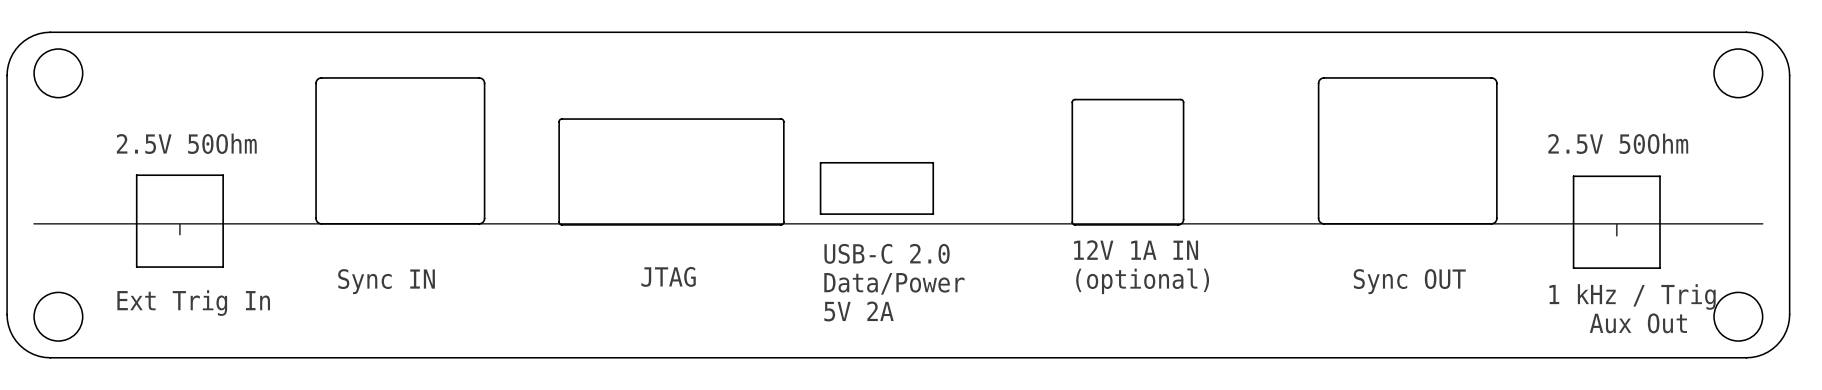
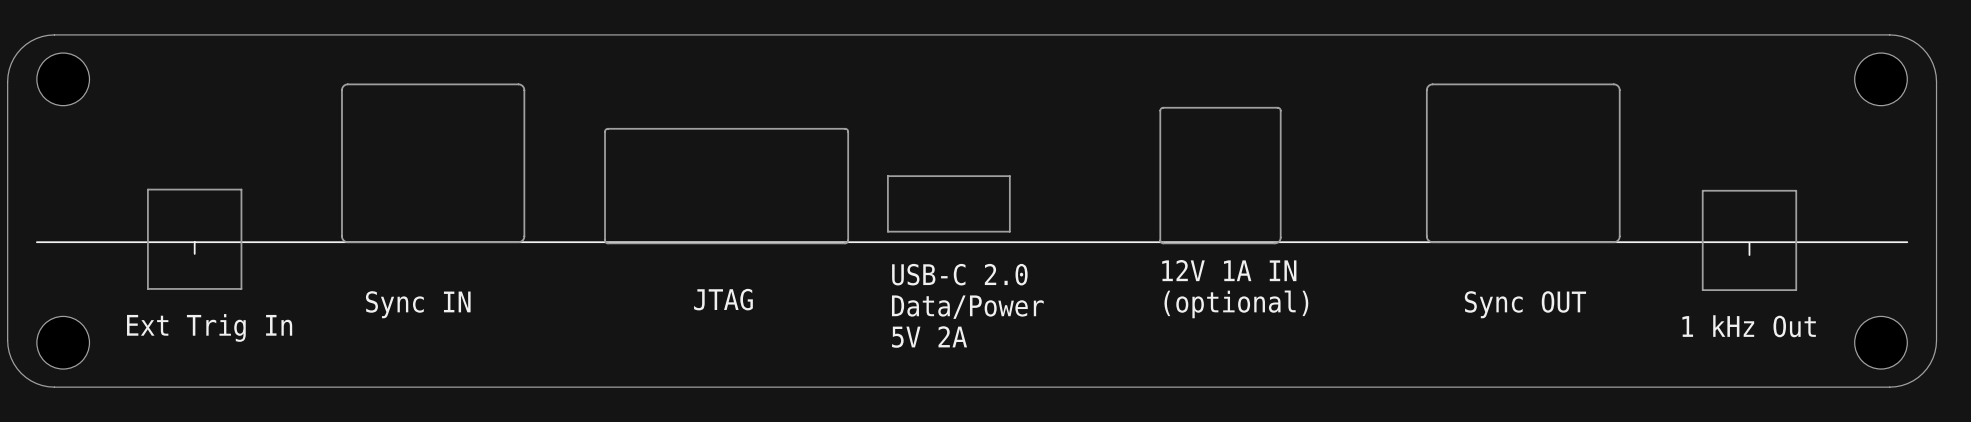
text: 2.5V 50Ohm (186, 143) -> none
text: 2.5V 50Ohm (1618, 143) -> none
text: 1 kHz / Trig (1632, 296) -> 1 kHz Out (1749, 326)
text: Aux Out (1638, 323) -> none

